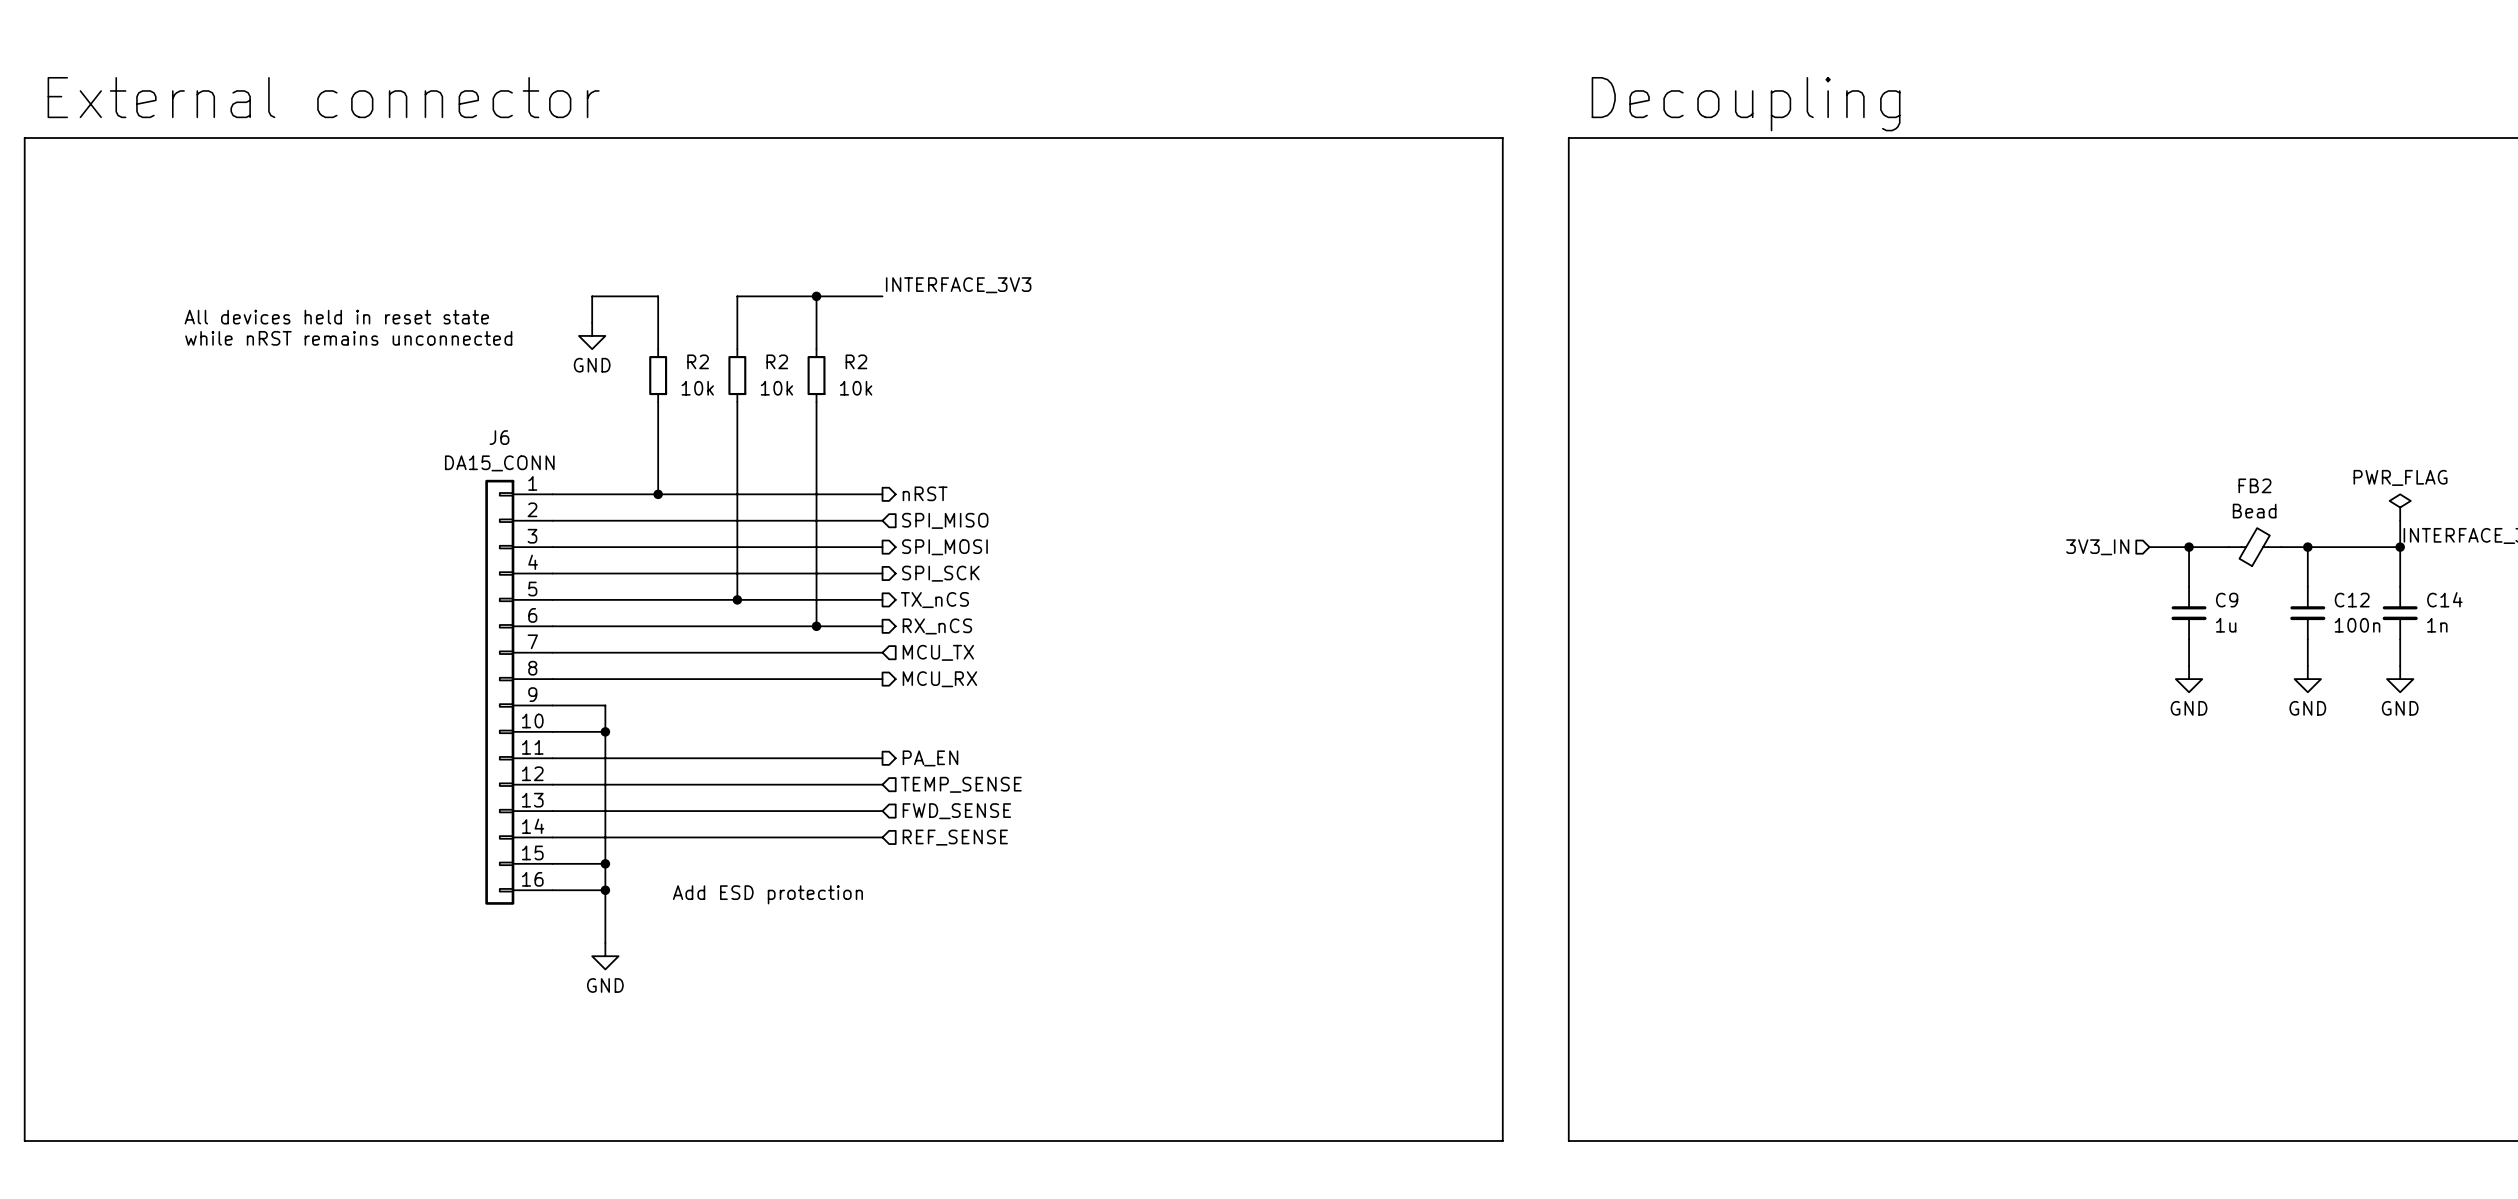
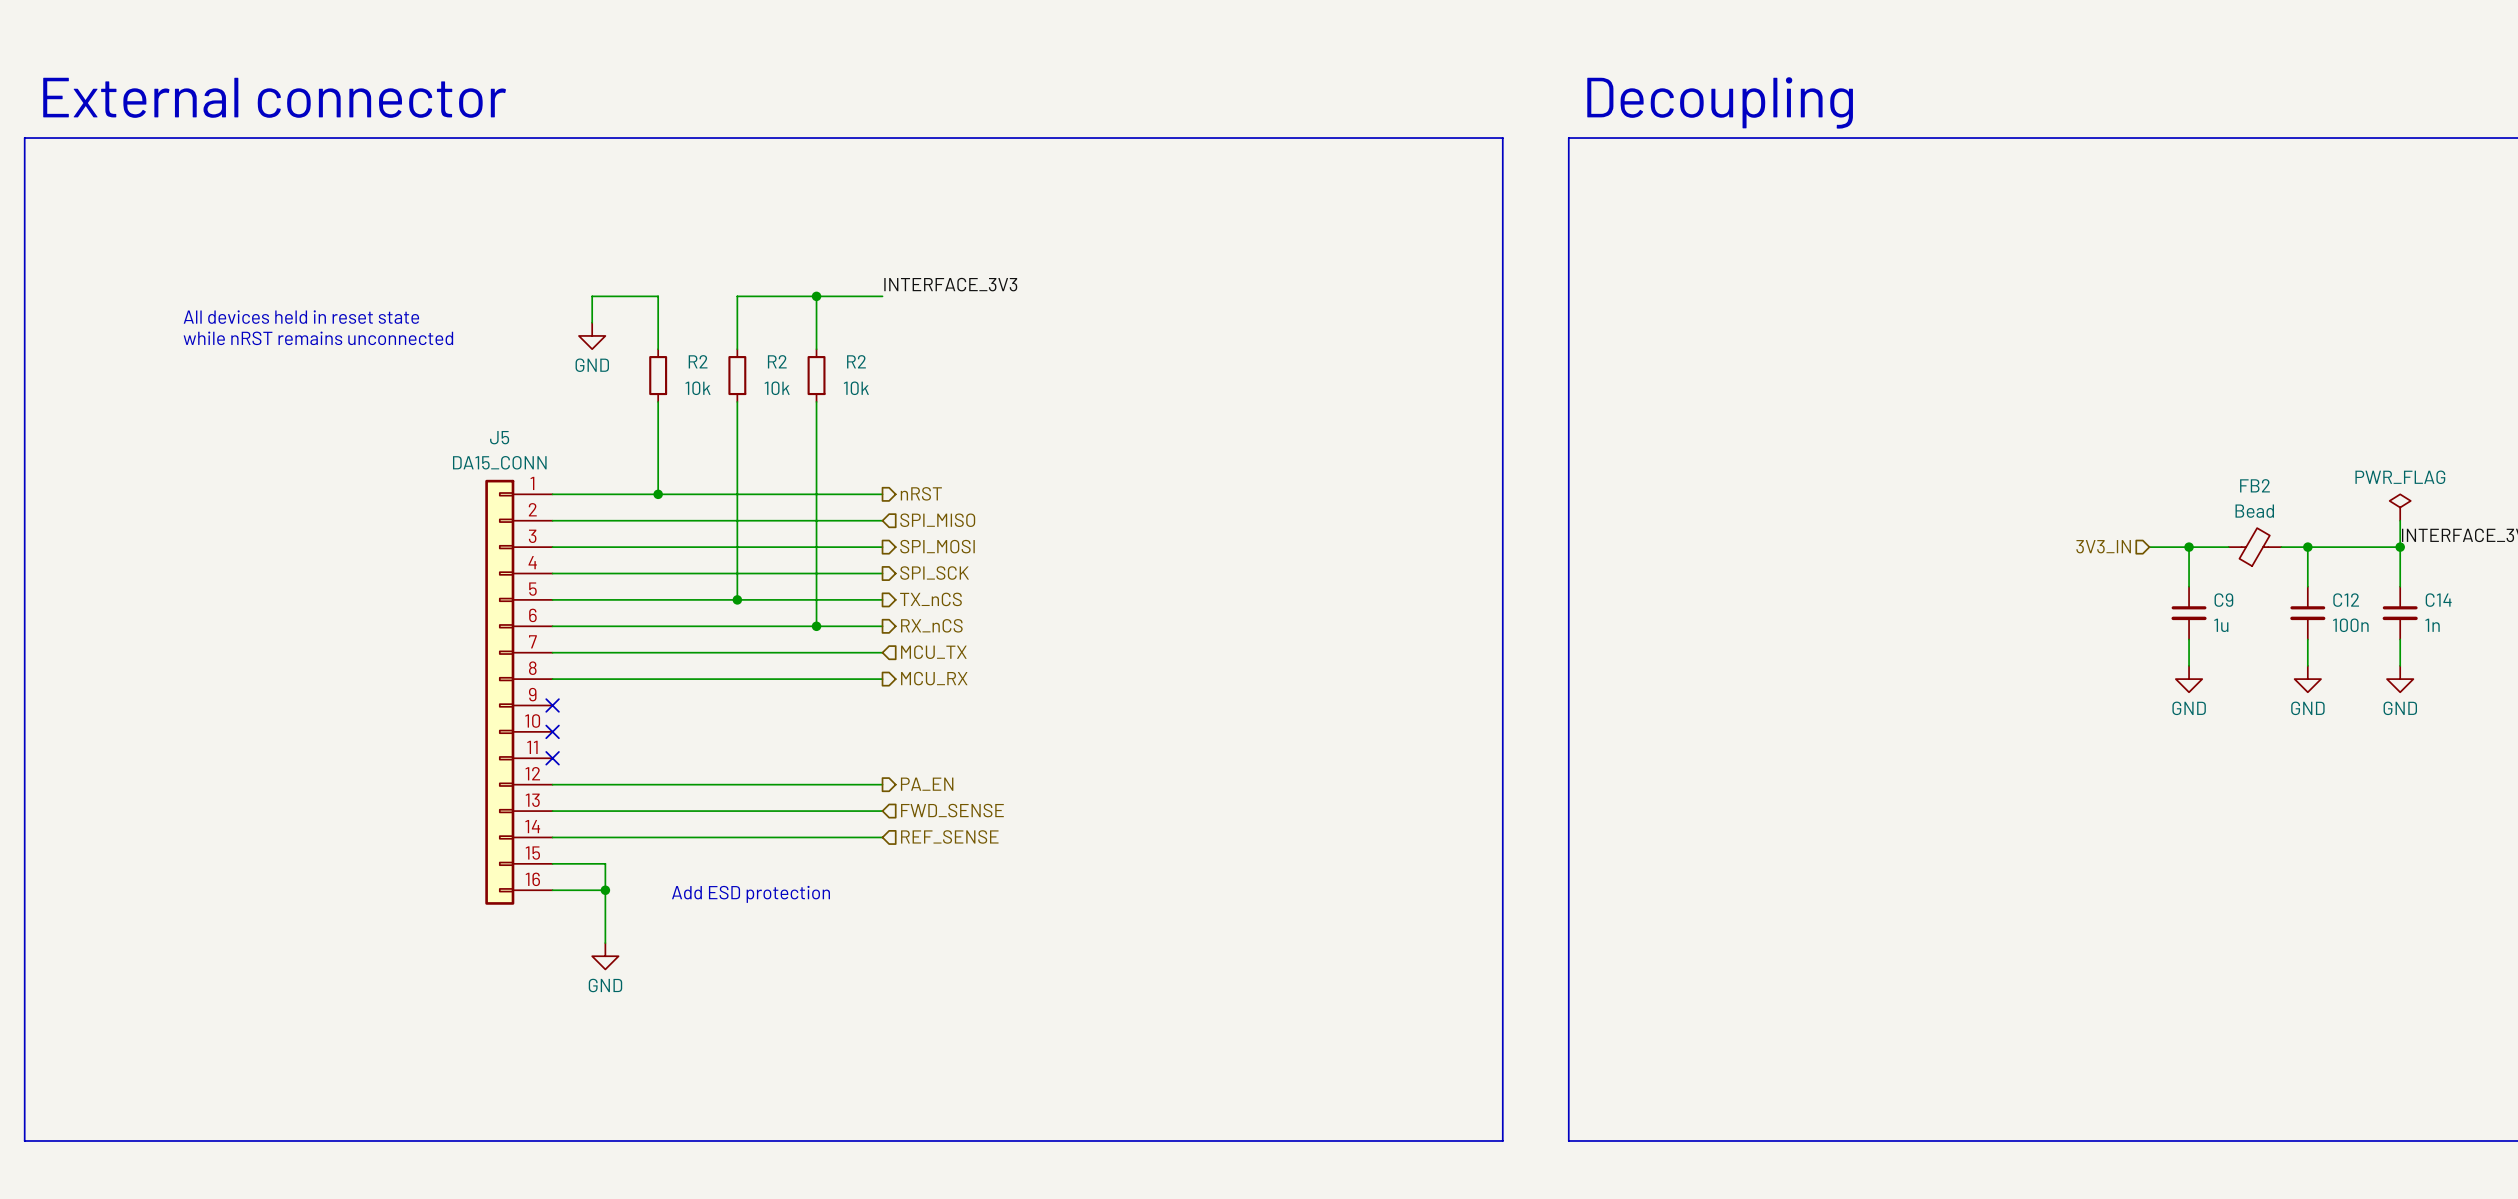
J6 name: J6 (499, 437) -> J5 (499, 437)
wire: (552, 705) (605, 705) (605, 863) -> none
no-connect mark: none -> (552, 705)
wire: (552, 731) (605, 731) -> none
no-connect mark: none -> (552, 731)
junction: (605, 731) -> none
wire: (552, 758) (882, 758) -> none
no-connect mark: none -> (552, 758)
hierarchical label: PA_EN (930, 758) -> none
hierarchical label shape: input (961, 784) -> output (927, 784)
hierarchical label: TEMP_SENSE (961, 784) -> PA_EN (927, 784)
junction: (605, 863) -> none

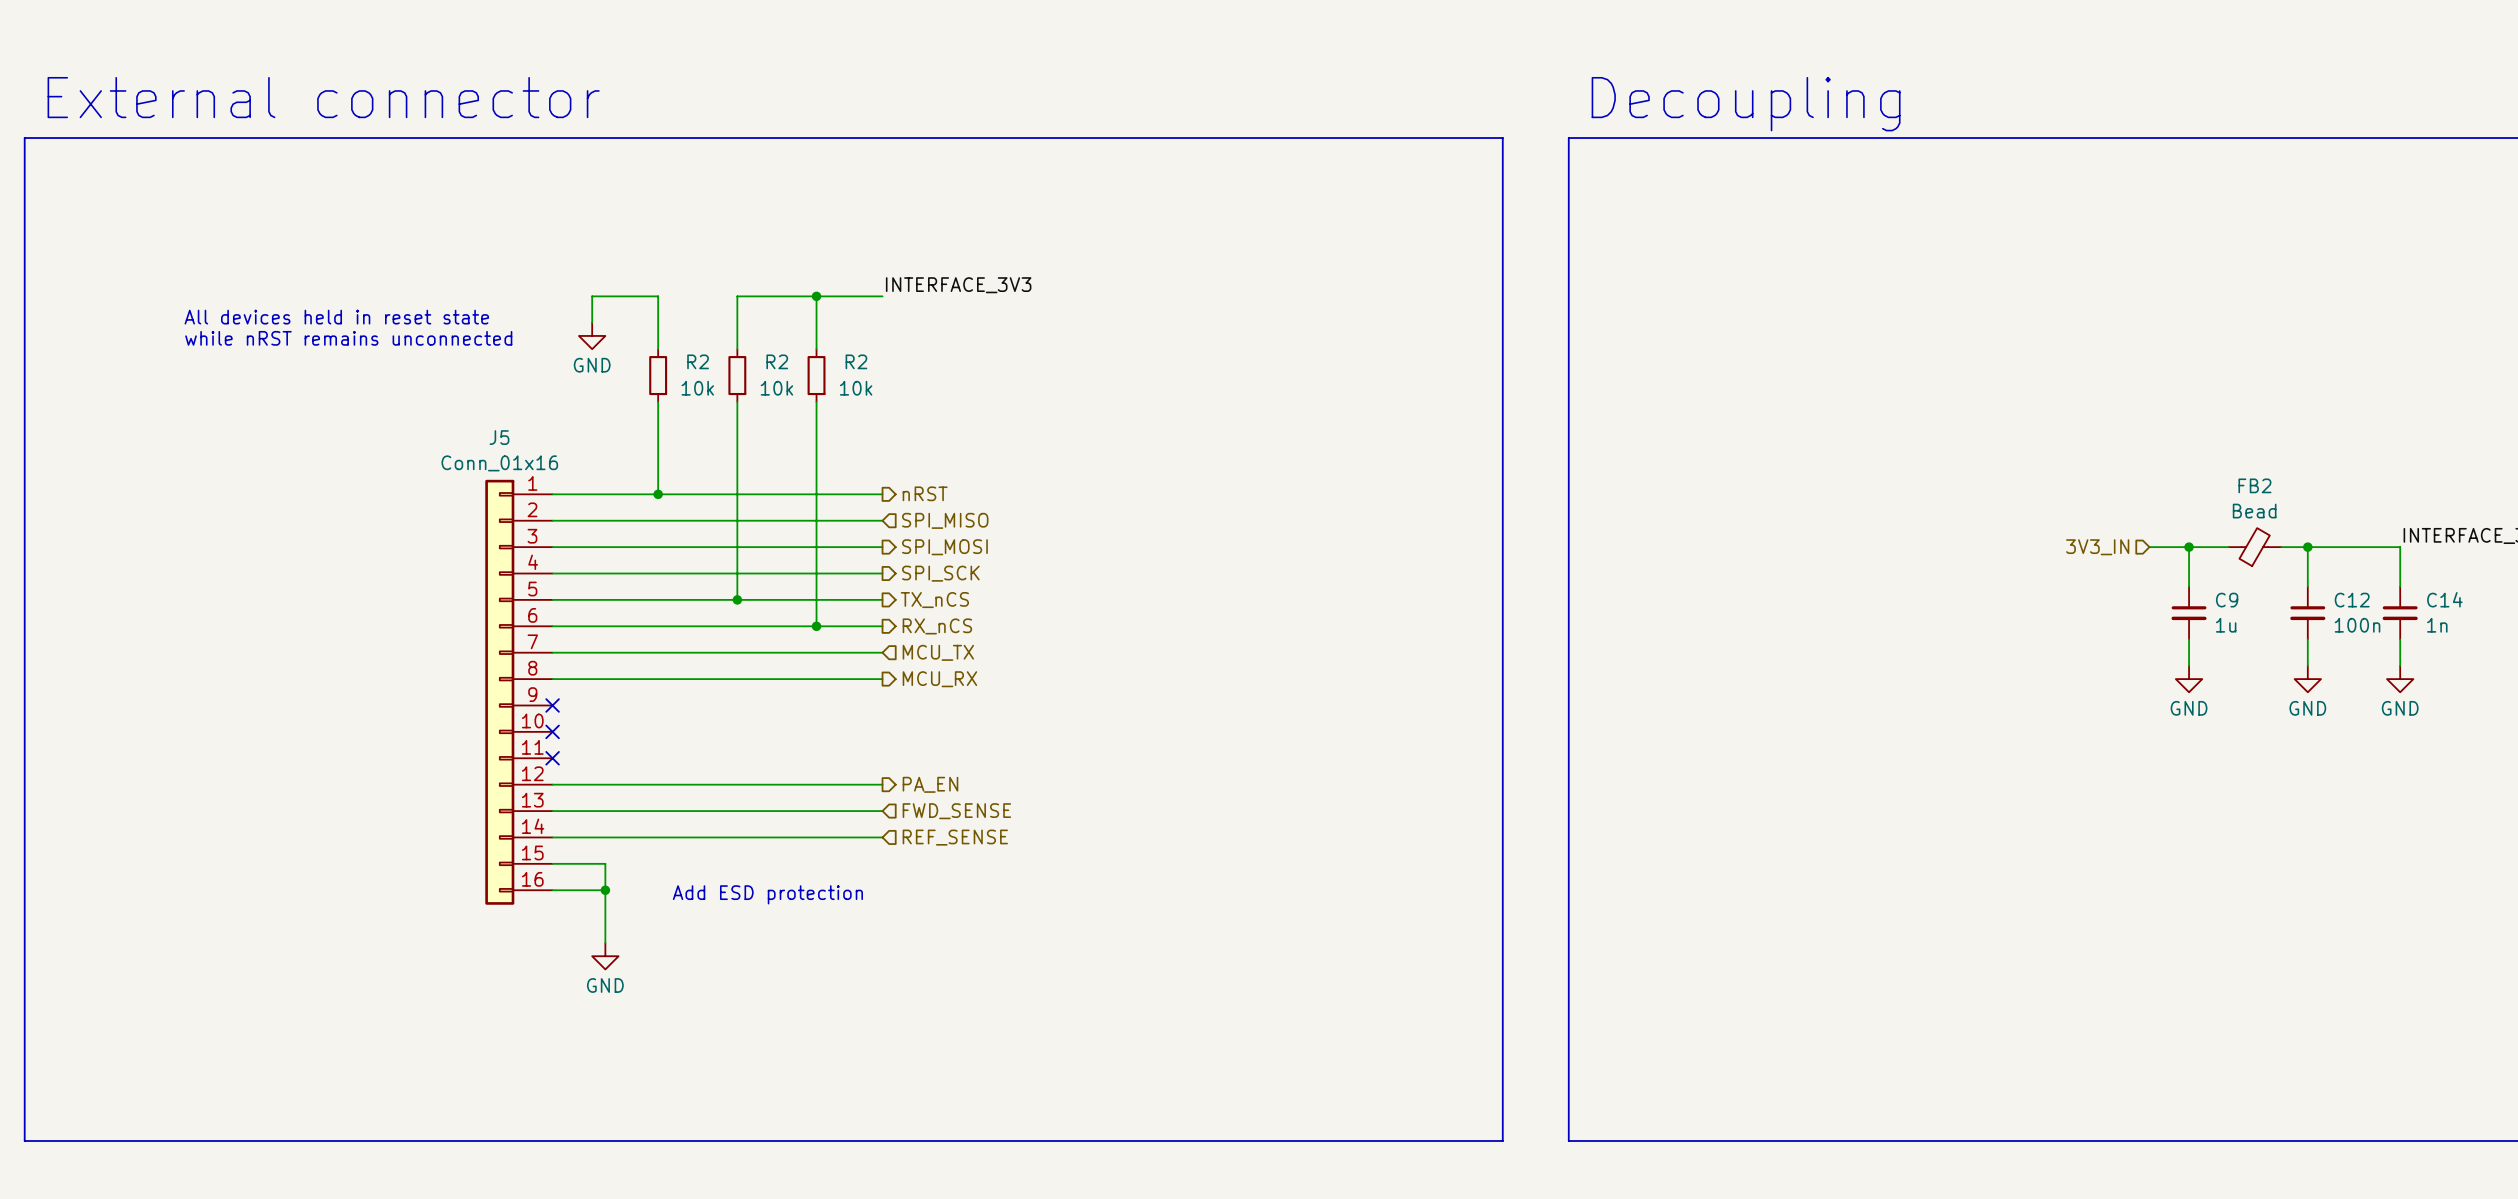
J5 value: DA15_CONN (499, 462) -> Conn_01x16 (499, 463)
power symbol: PWR_FLAG (2400, 507) -> none
wire: (2400, 520) (2400, 547) -> none
junction: (2400, 547) -> none

